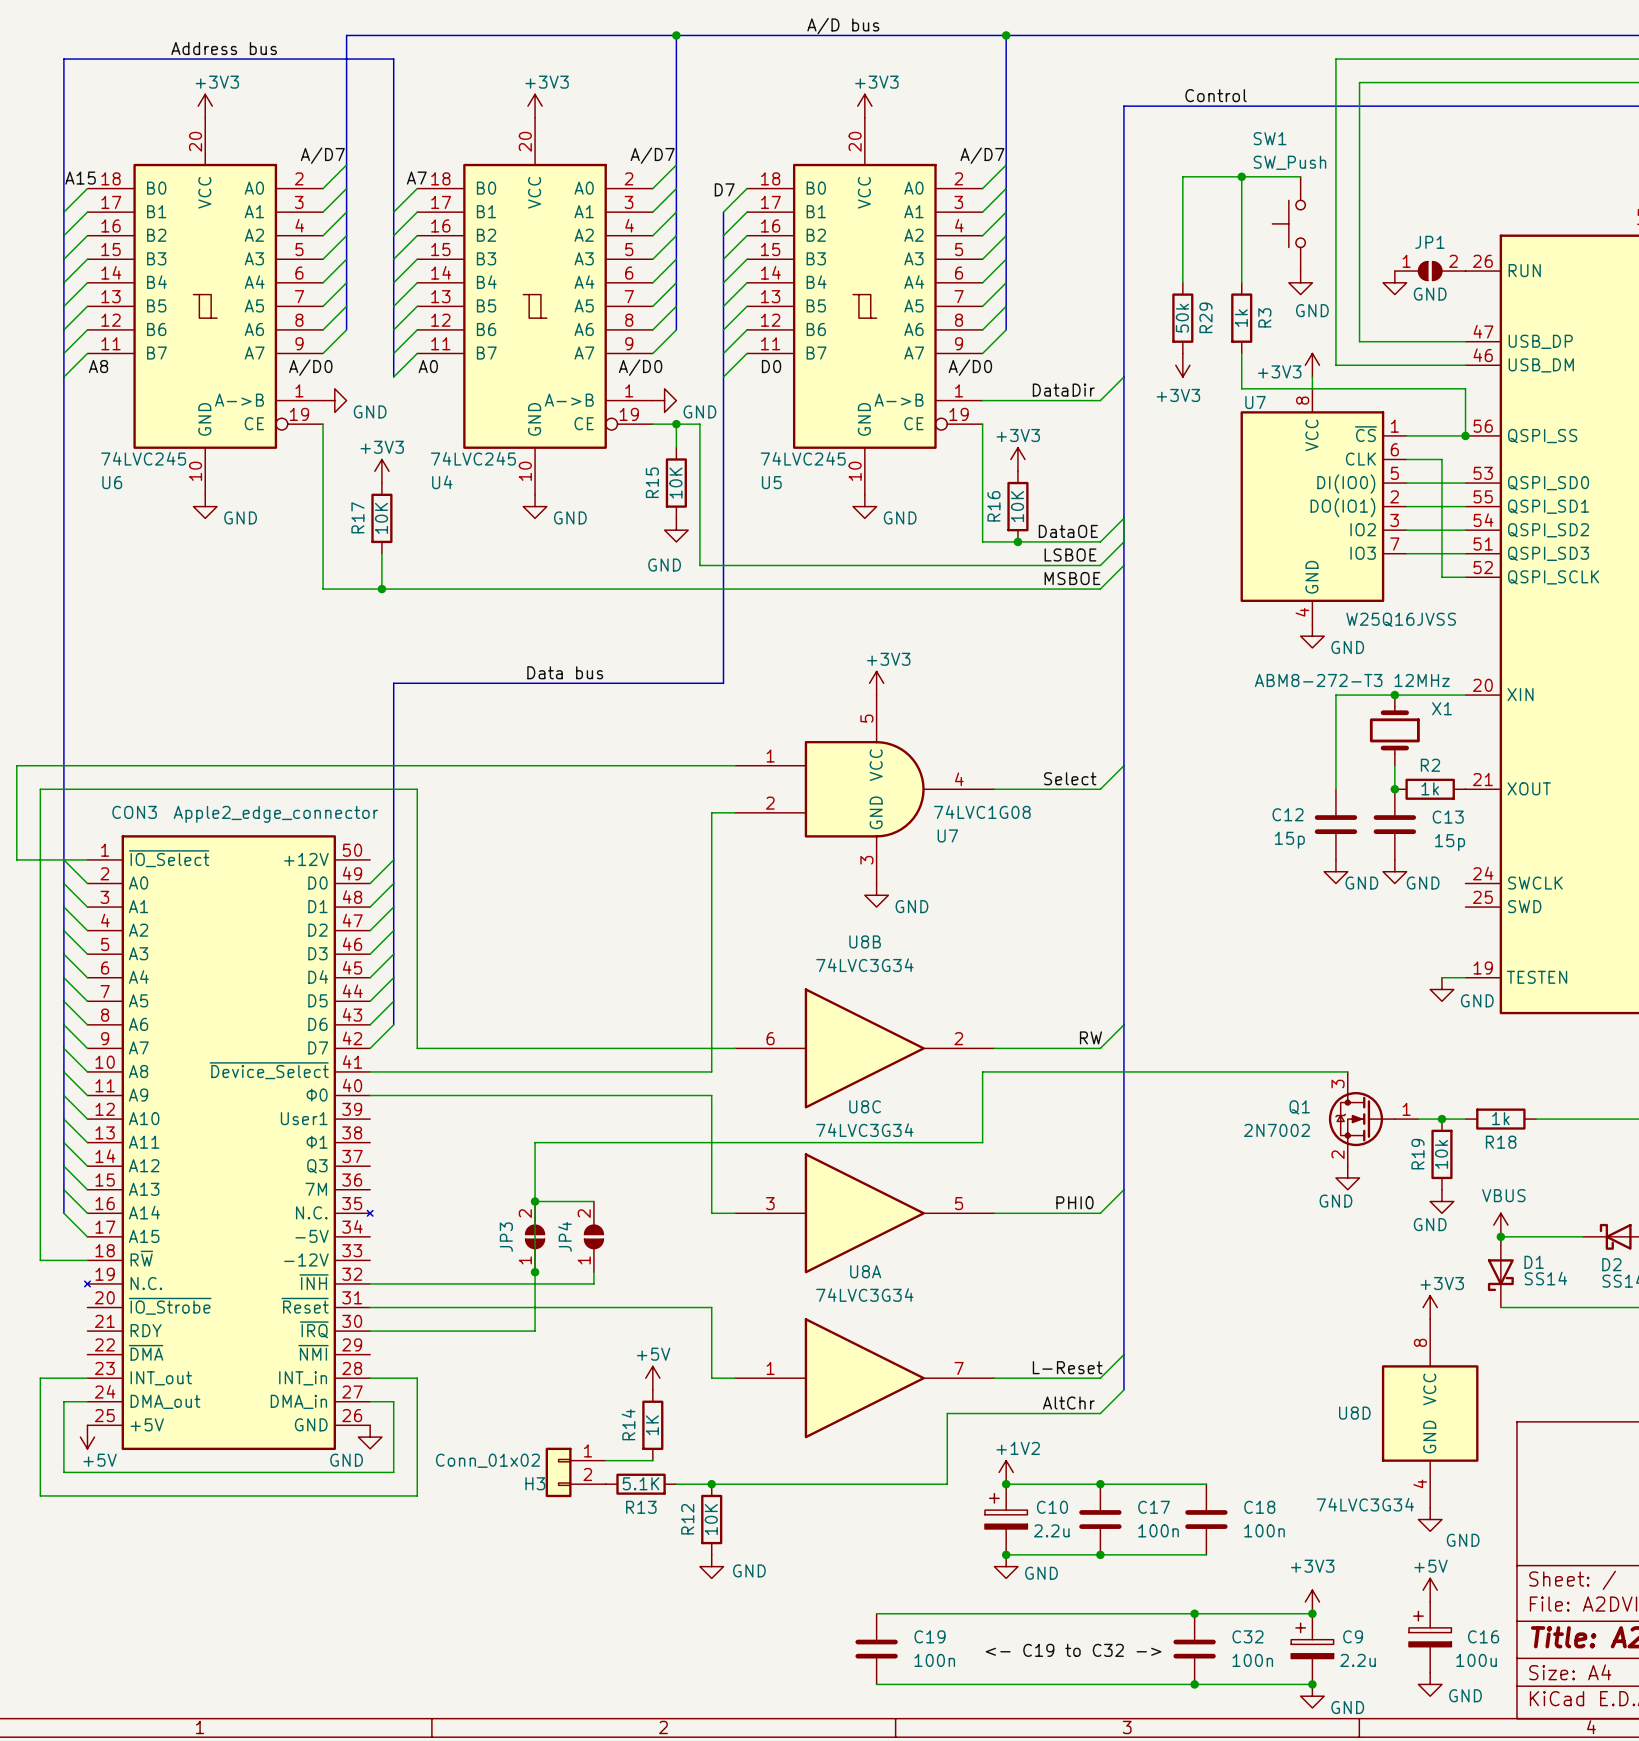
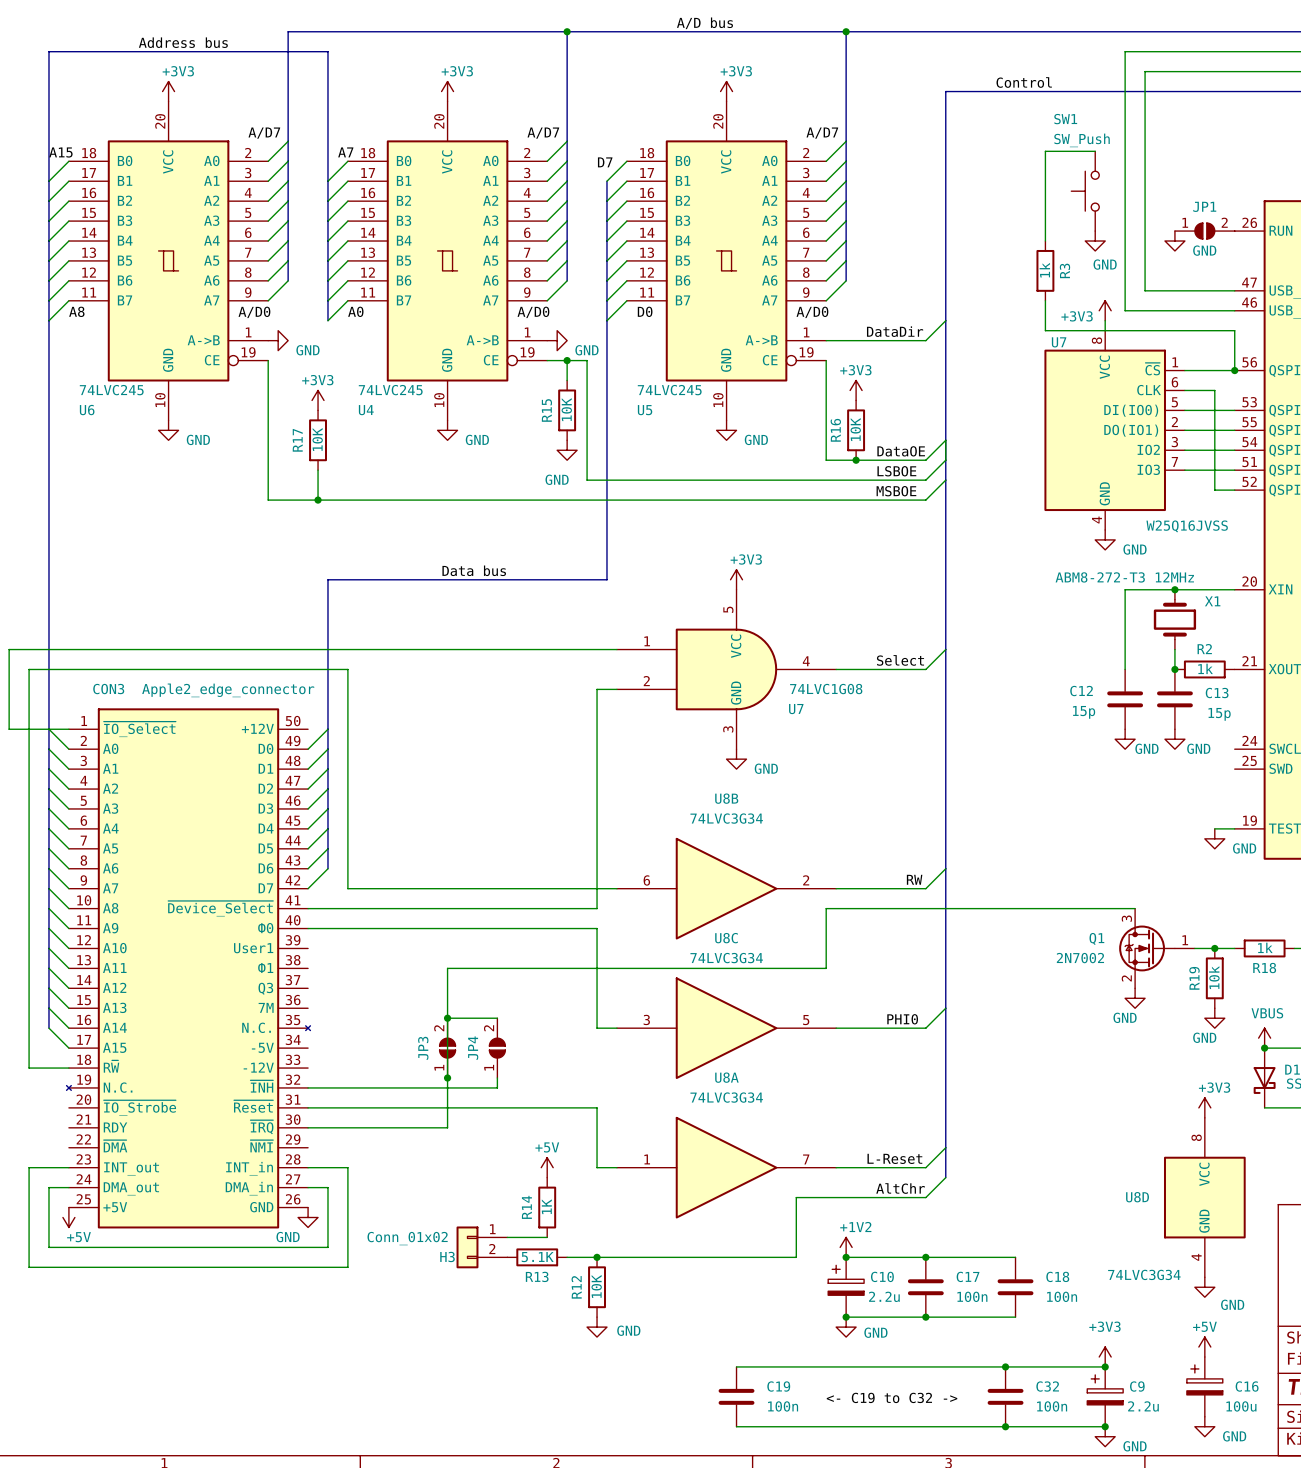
wire: (1241, 176) (1182, 176) (1182, 282) -> none
junction: (1241, 176) -> none
R29: 50k (1182, 318) -> none
power symbol: +3V3 (1182, 365) -> none

